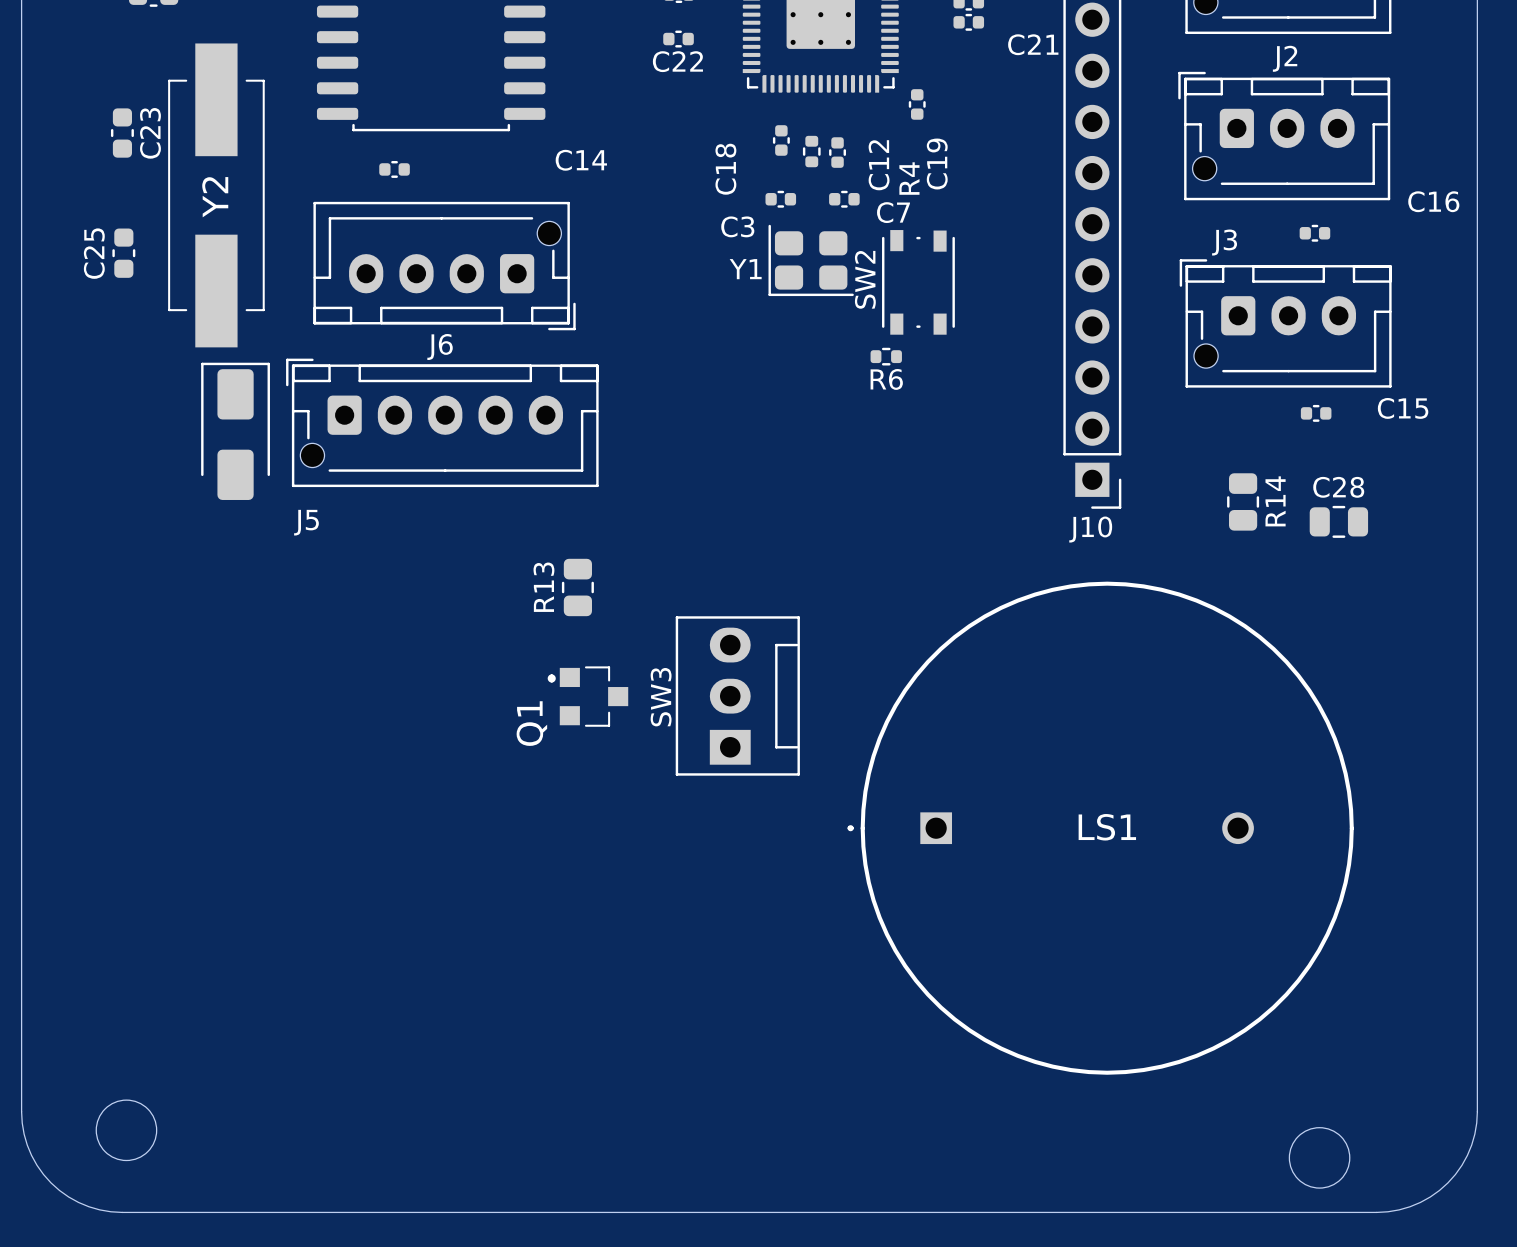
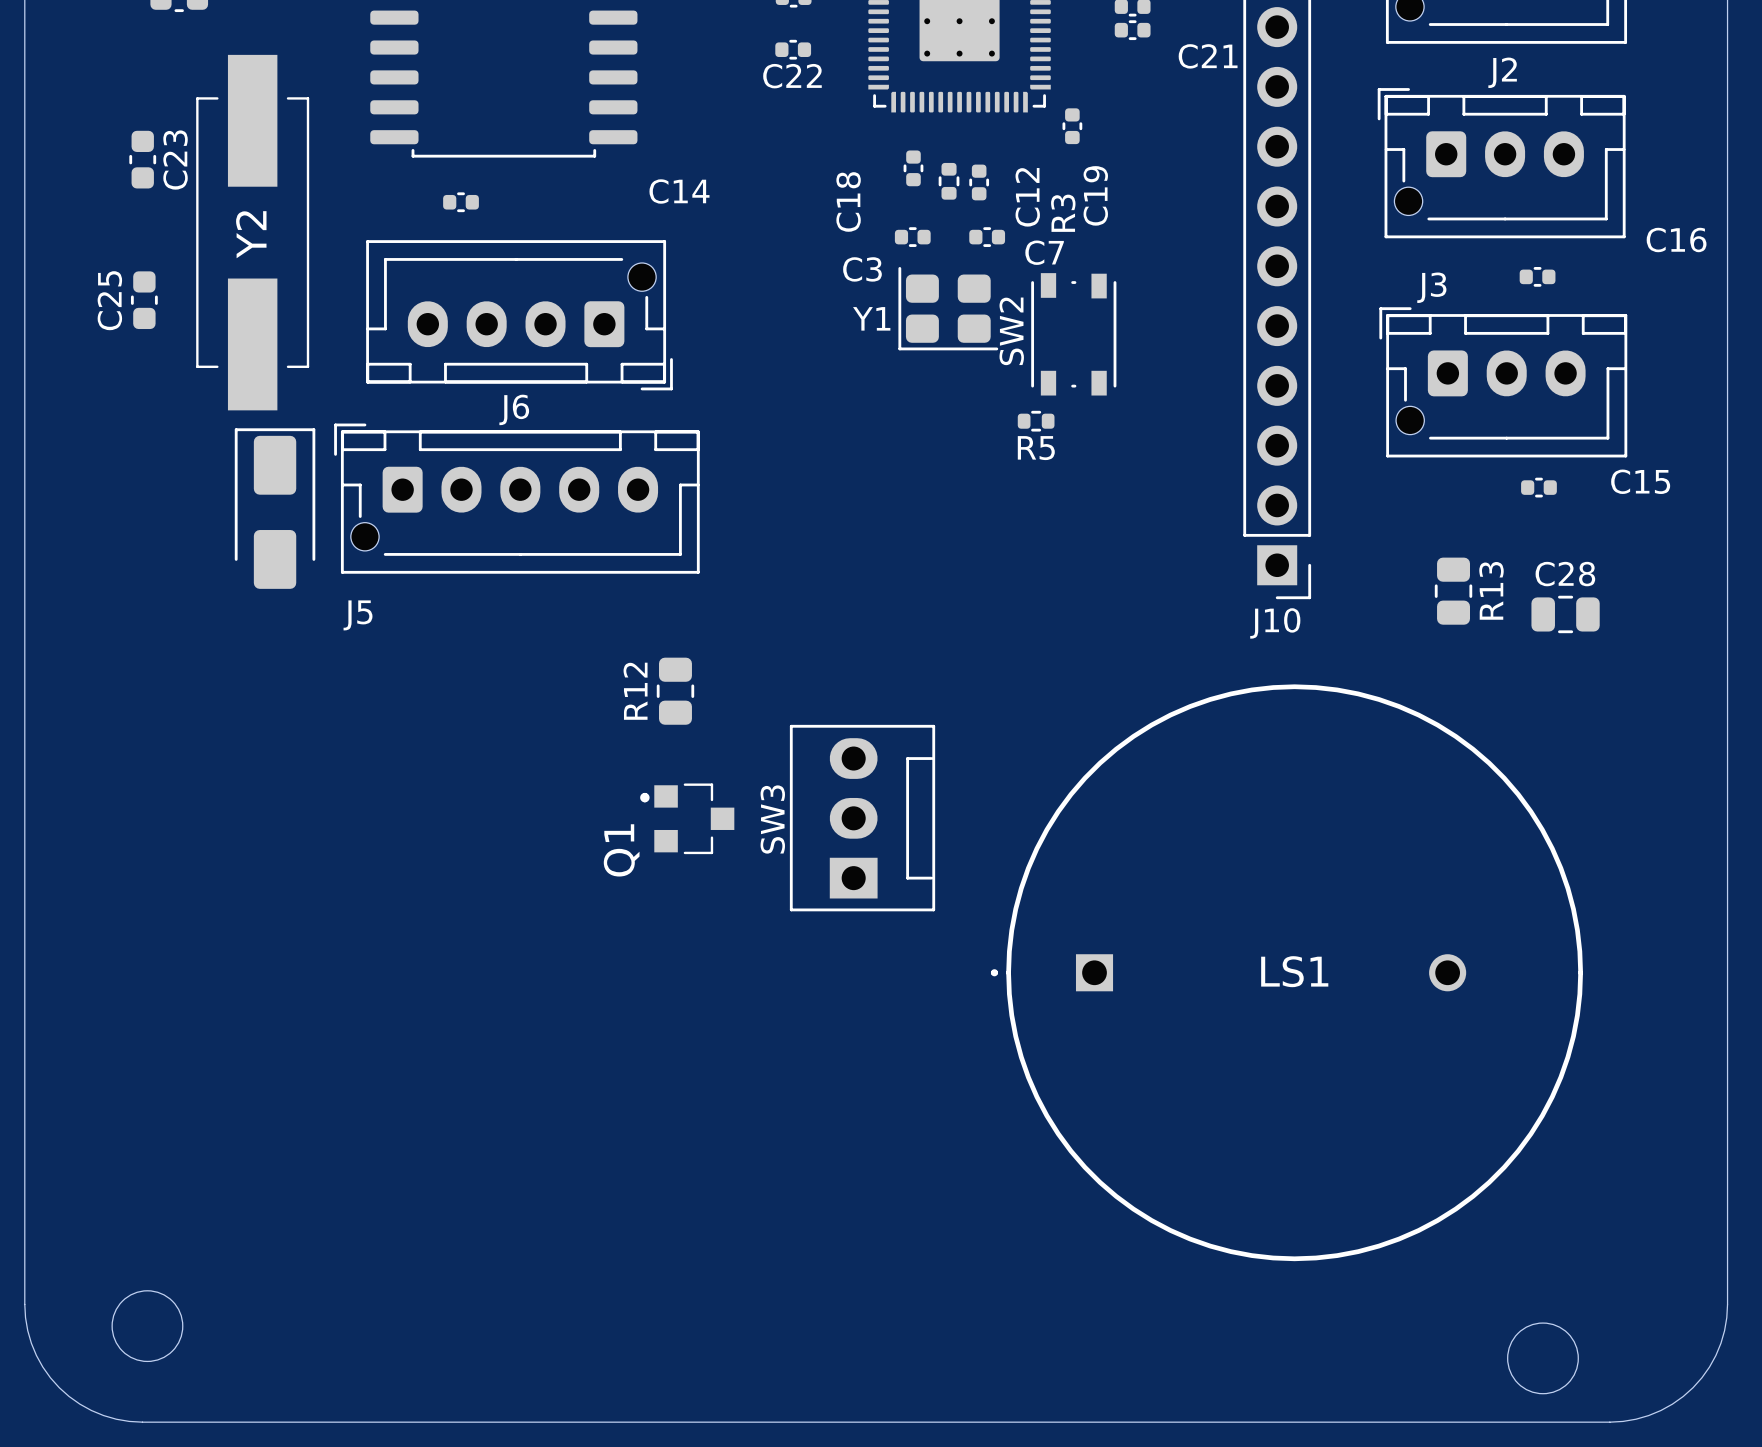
R4 name: R4 (909, 178) -> R3 (1063, 213)
R6 name: R6 (886, 379) -> R5 (1036, 448)
R14 name: R14 (1275, 501) -> R13 (1491, 590)
R13 name: R13 (543, 587) -> R12 (635, 691)

